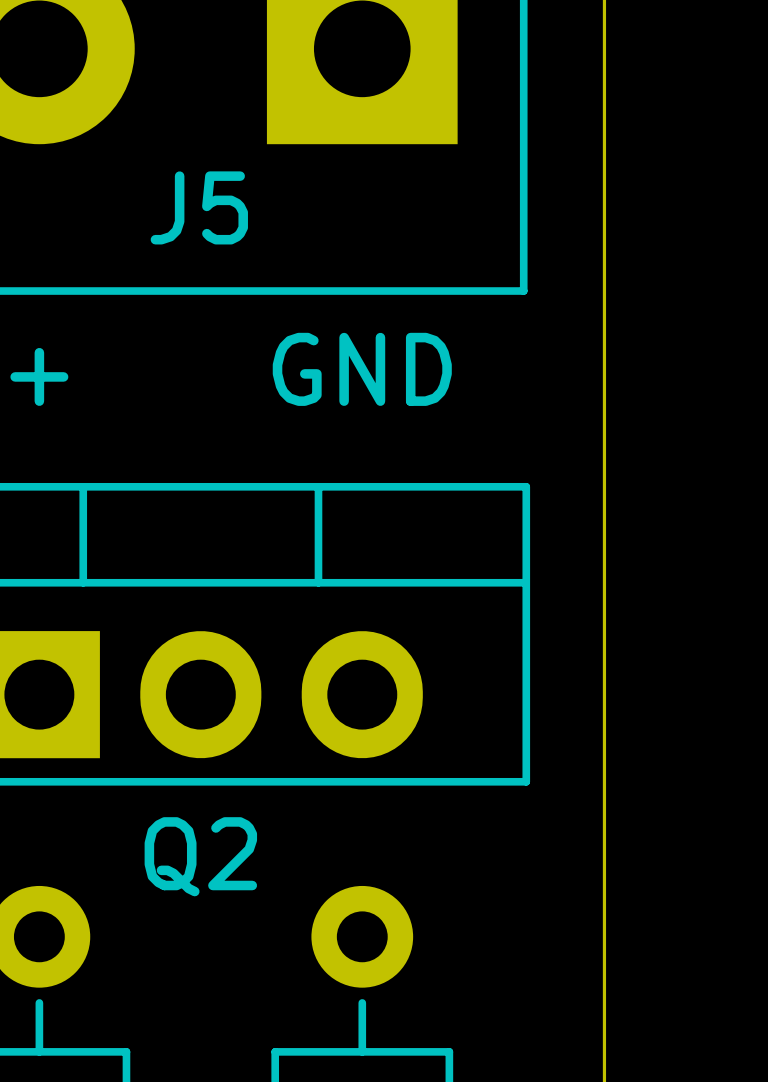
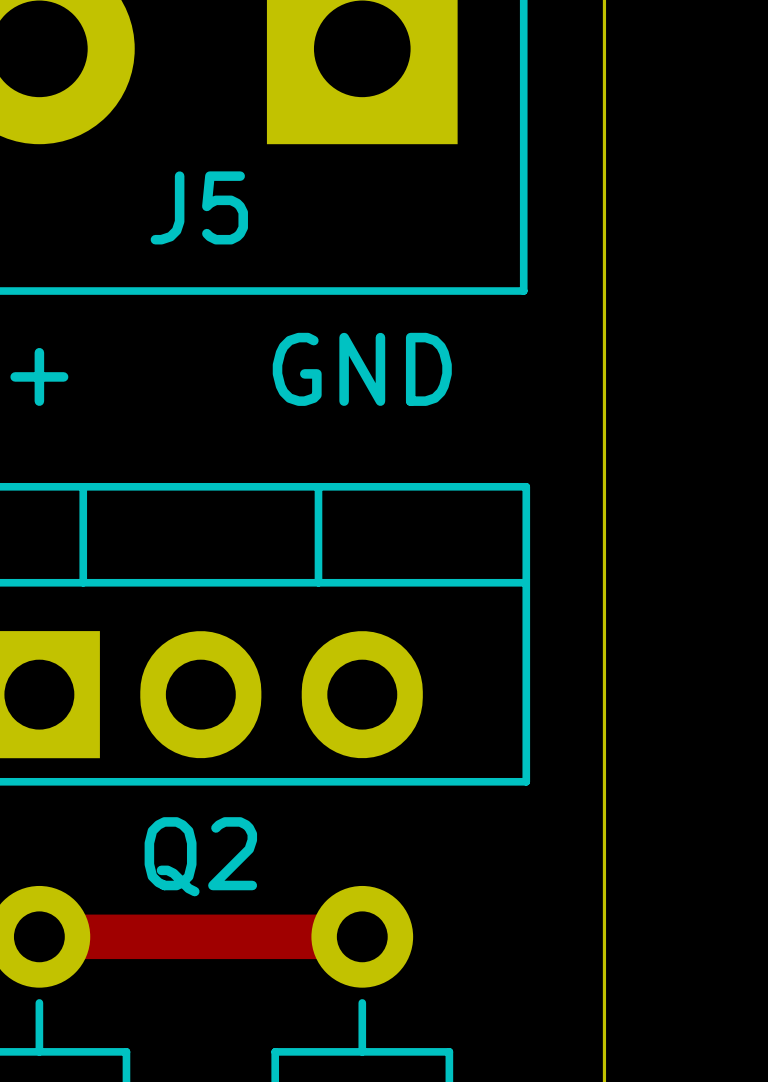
track: none -> (39, 936) (362, 936)

